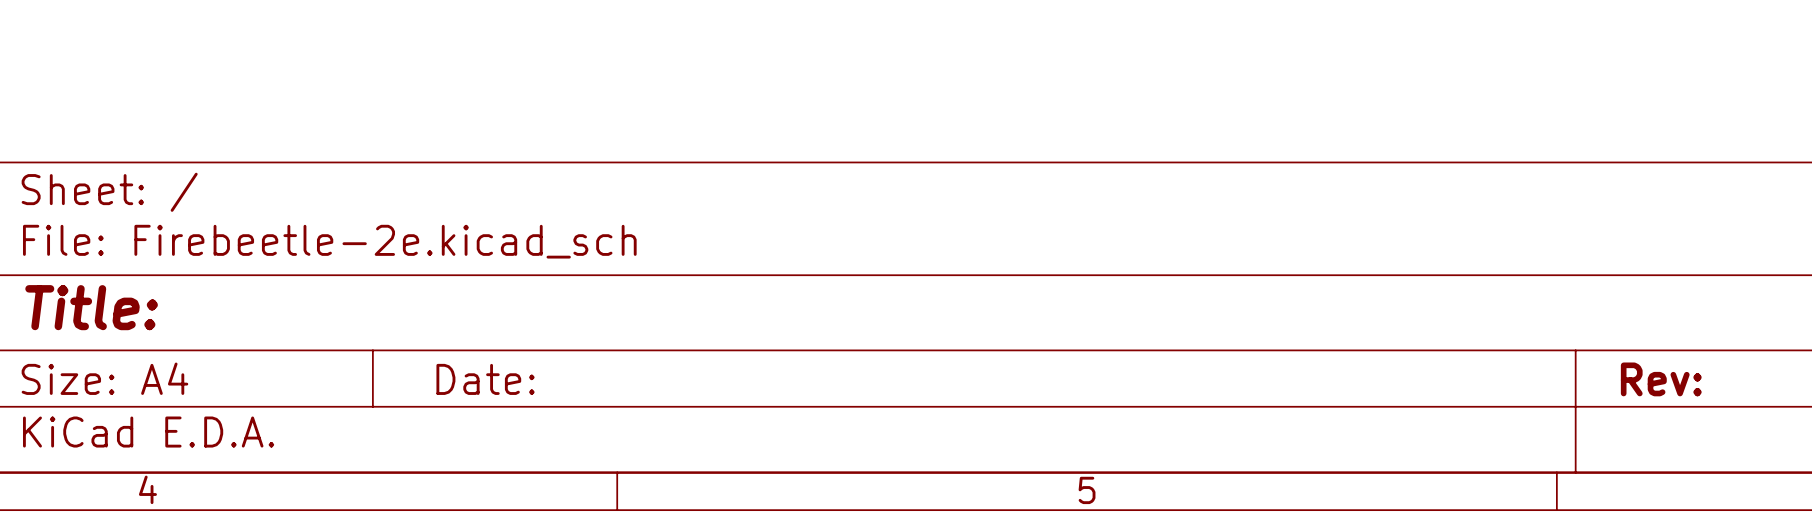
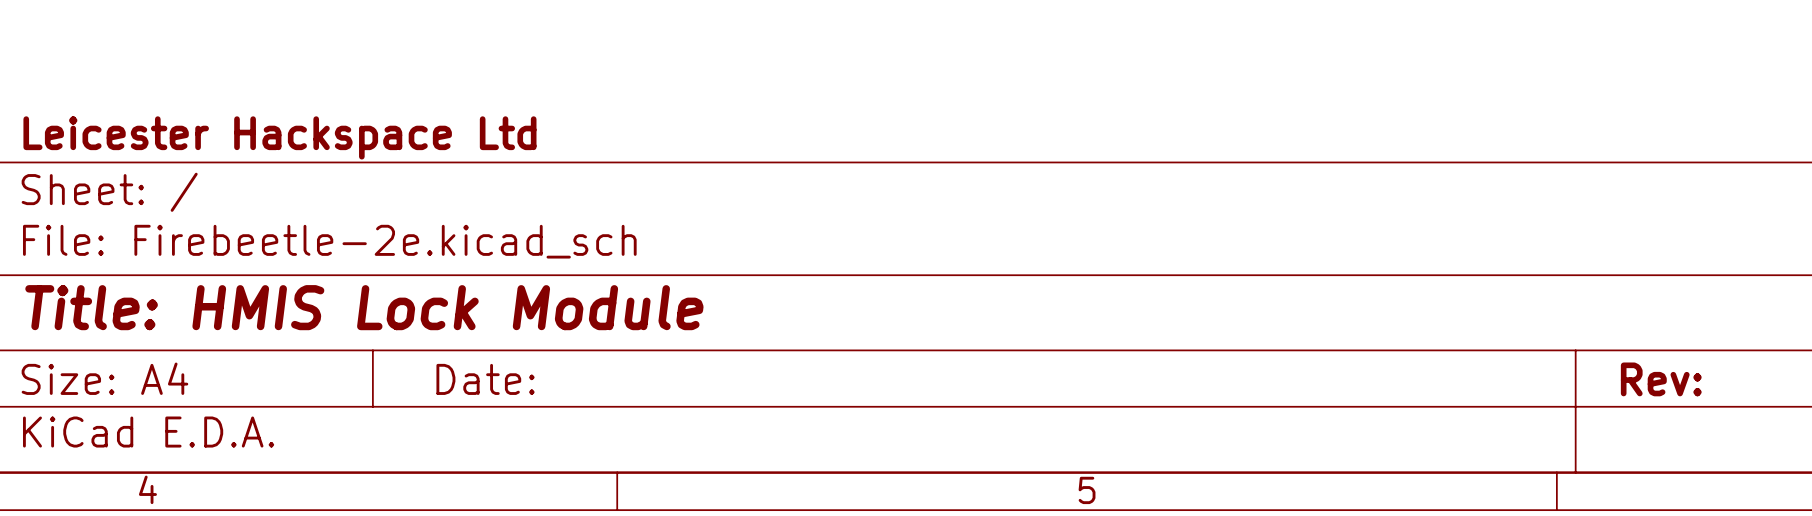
title block: none -> Leicester Hackspace Ltd (279, 137)
title block: Title: (91, 307) -> Title: HMIS Lock Module (364, 307)

